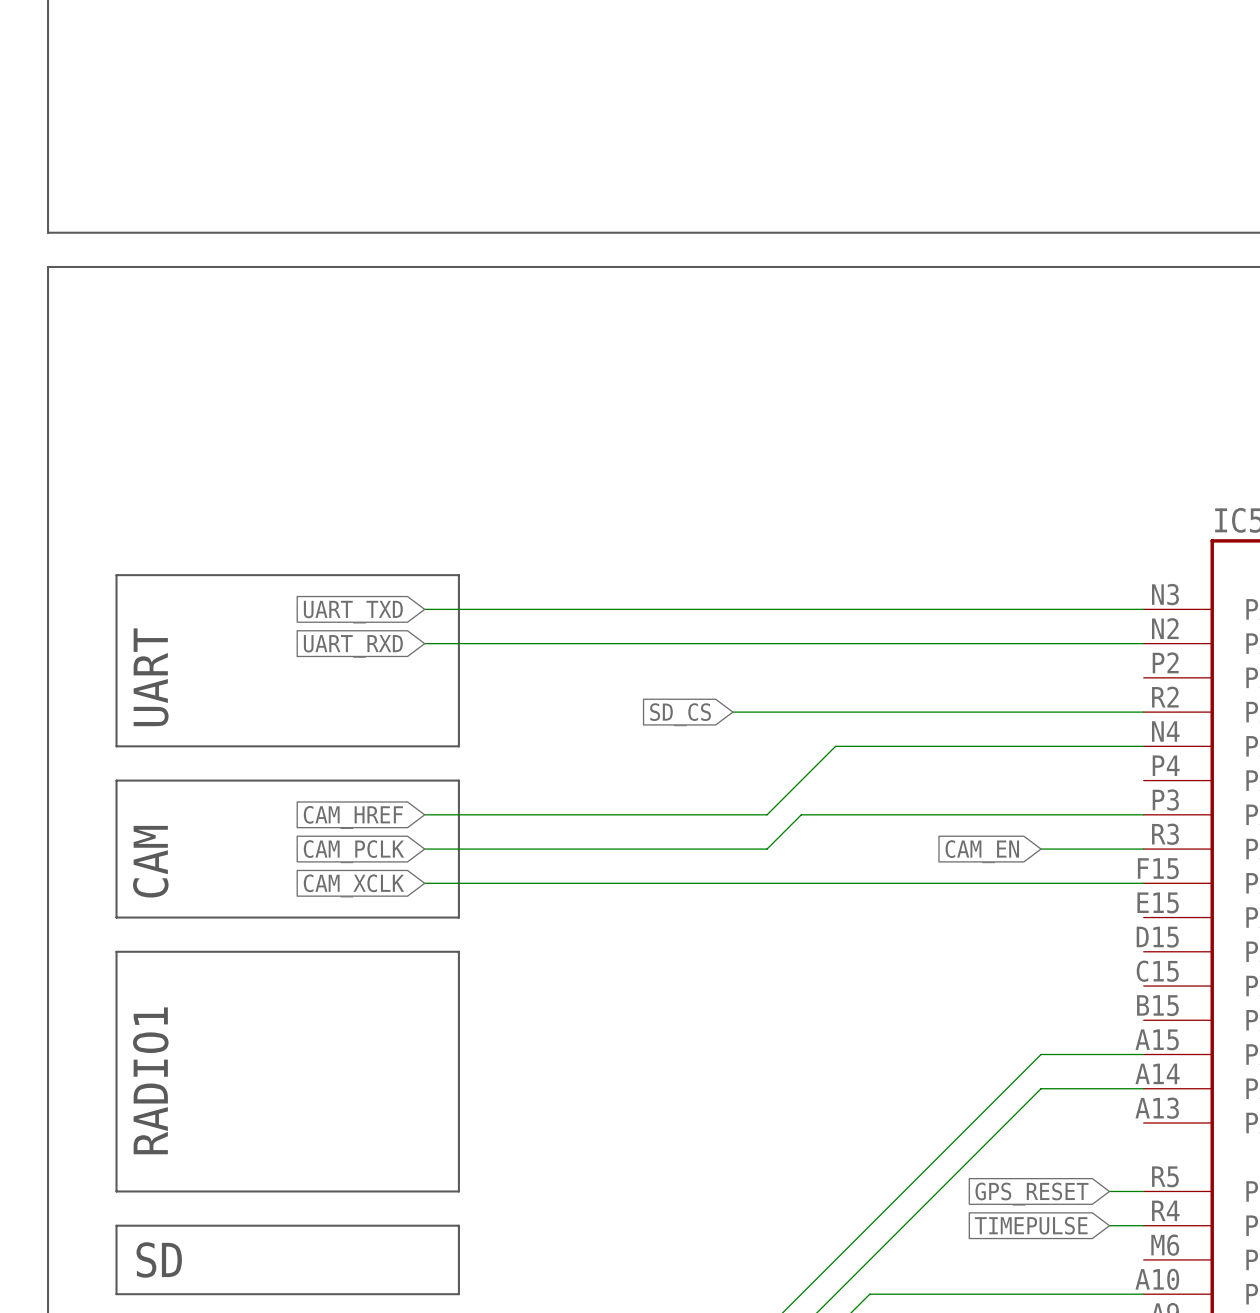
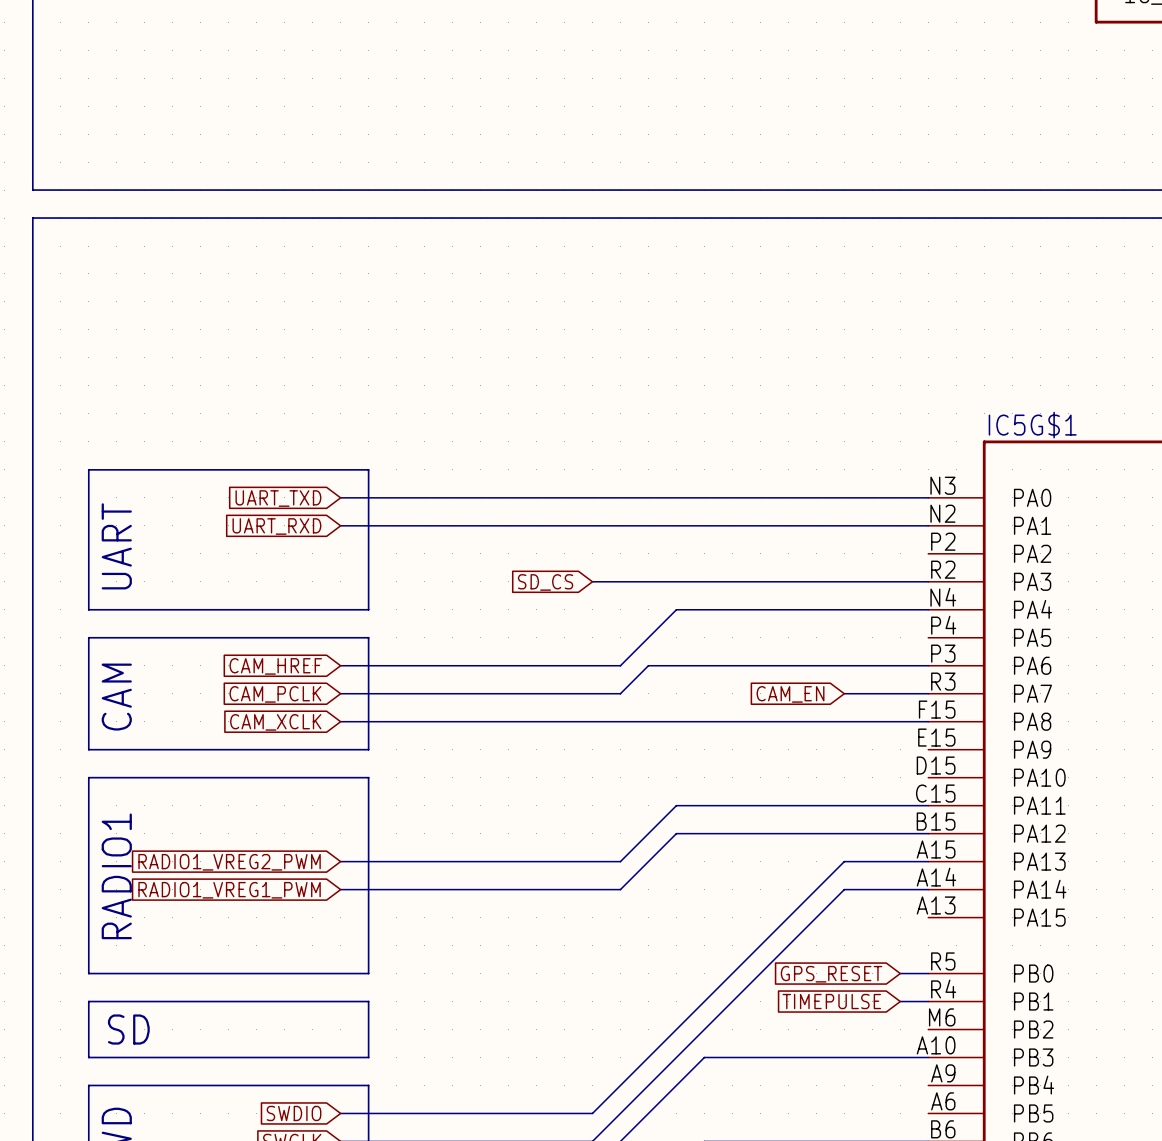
wire: none -> (928, 805) (676, 805) (620, 861) (340, 861)
wire: none -> (928, 833) (676, 833) (620, 889) (340, 889)
global label: none -> RADIO1_VREG2_PWM (229, 862)
global label: none -> RADIO1_VREG1_PWM (229, 890)

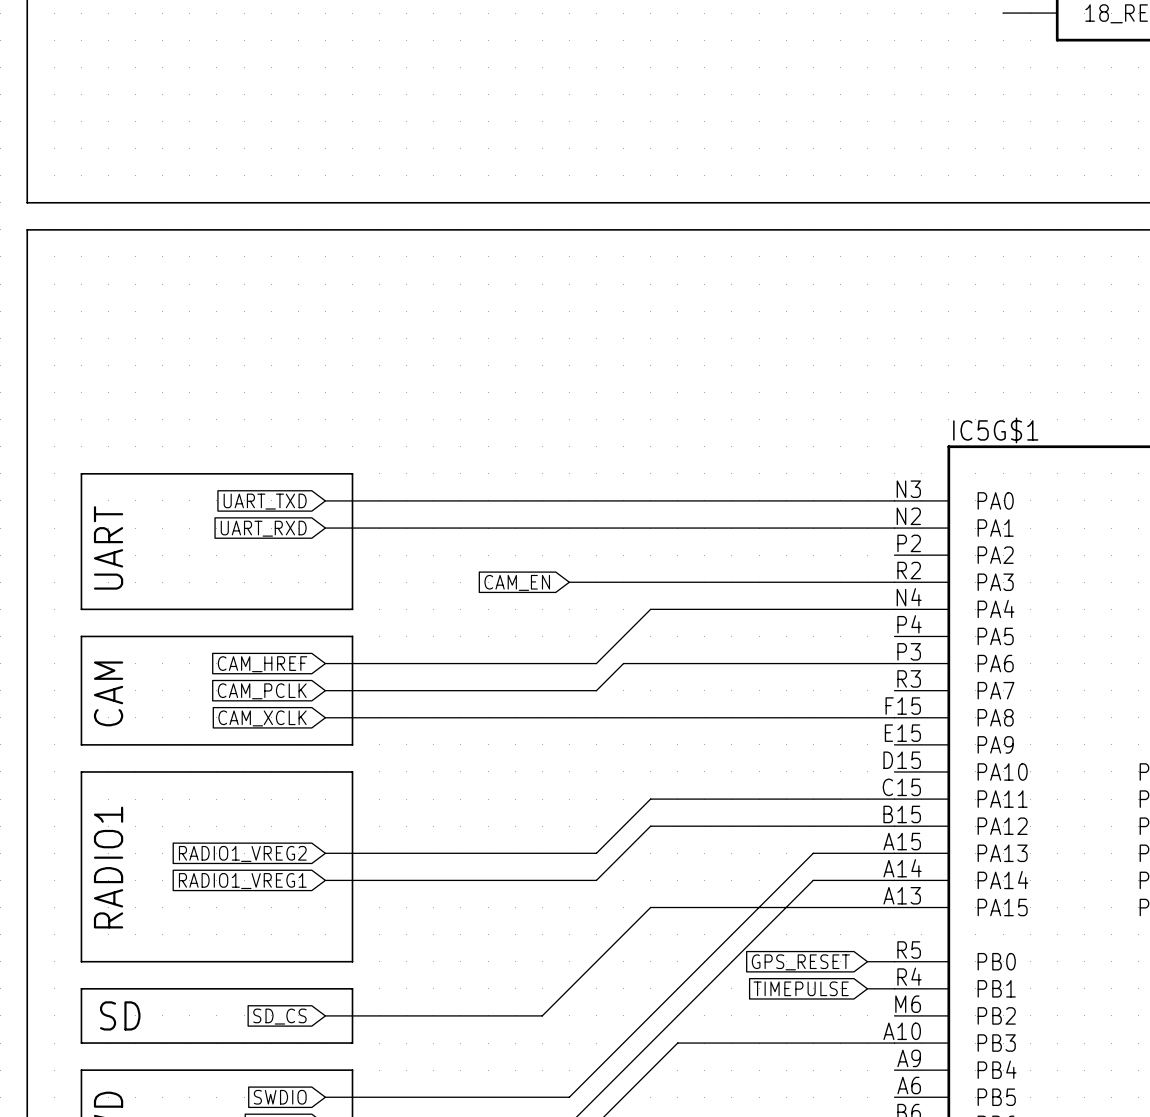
global label: SD_CS (545, 582) -> CAM_EN (517, 582)
wire: (844, 693) (928, 693) -> none
global label: CAM_EN (790, 694) -> none
global label: RADIO1_VREG2_PWM (229, 862) -> RADIO1_VREG2 (242, 853)
global label: RADIO1_VREG1_PWM (229, 890) -> RADIO1_VREG1 (242, 881)
wire: none -> (894, 907) (650, 907) (542, 1015) (325, 1015)
global label: none -> SD_CS (279, 1016)

